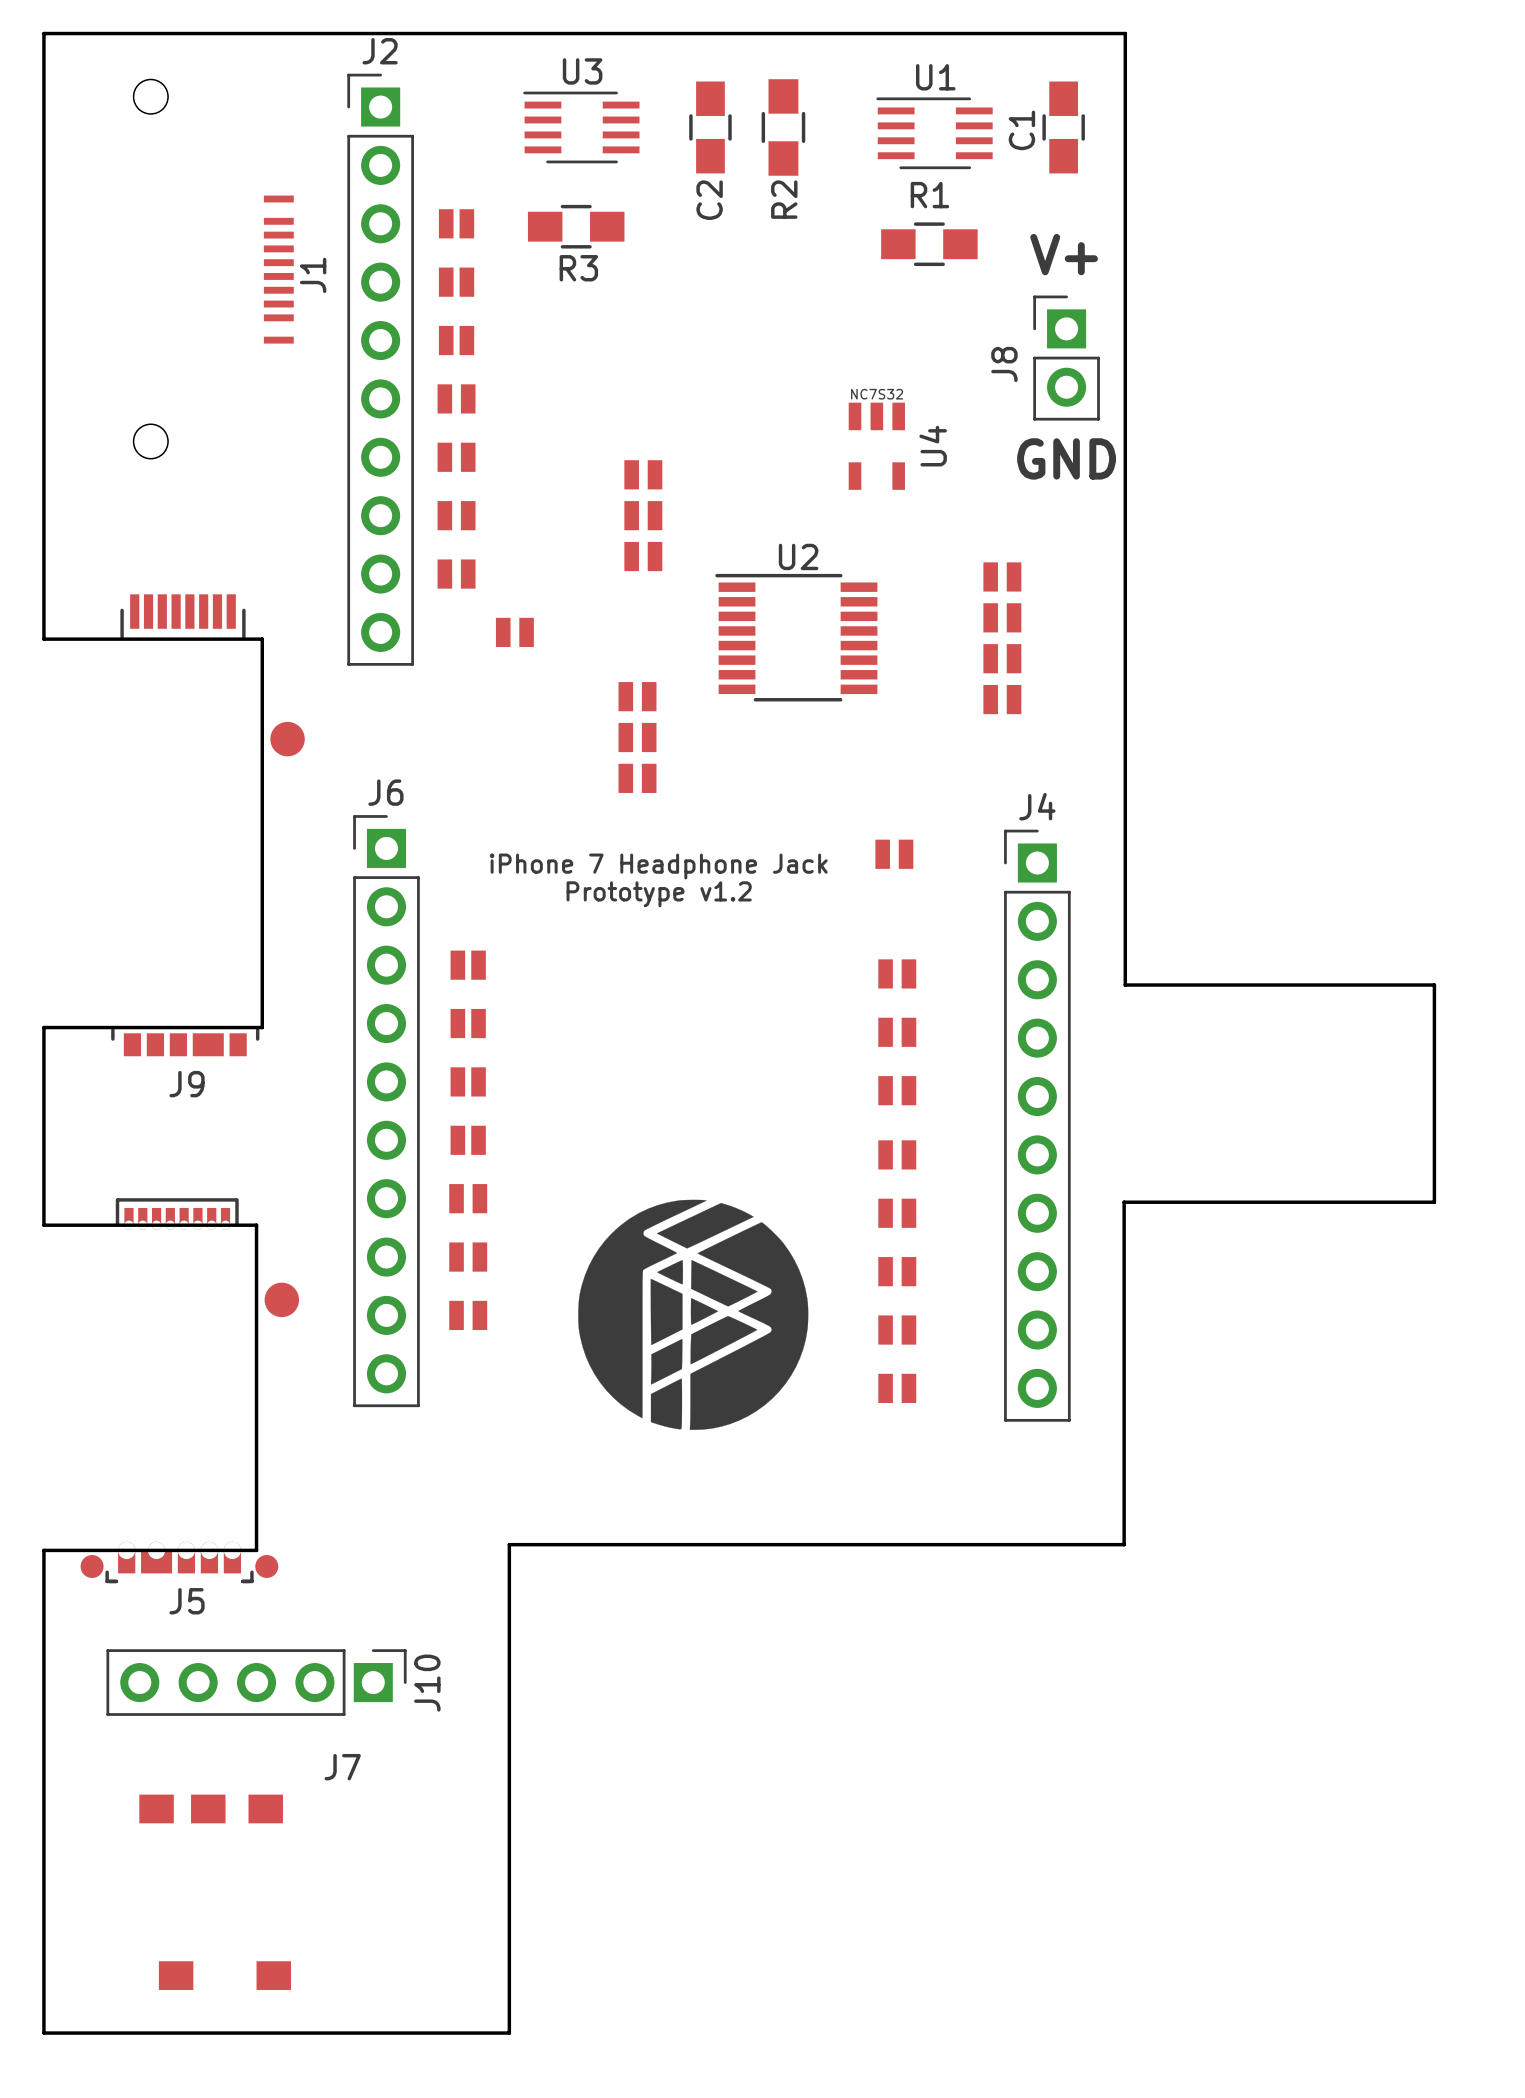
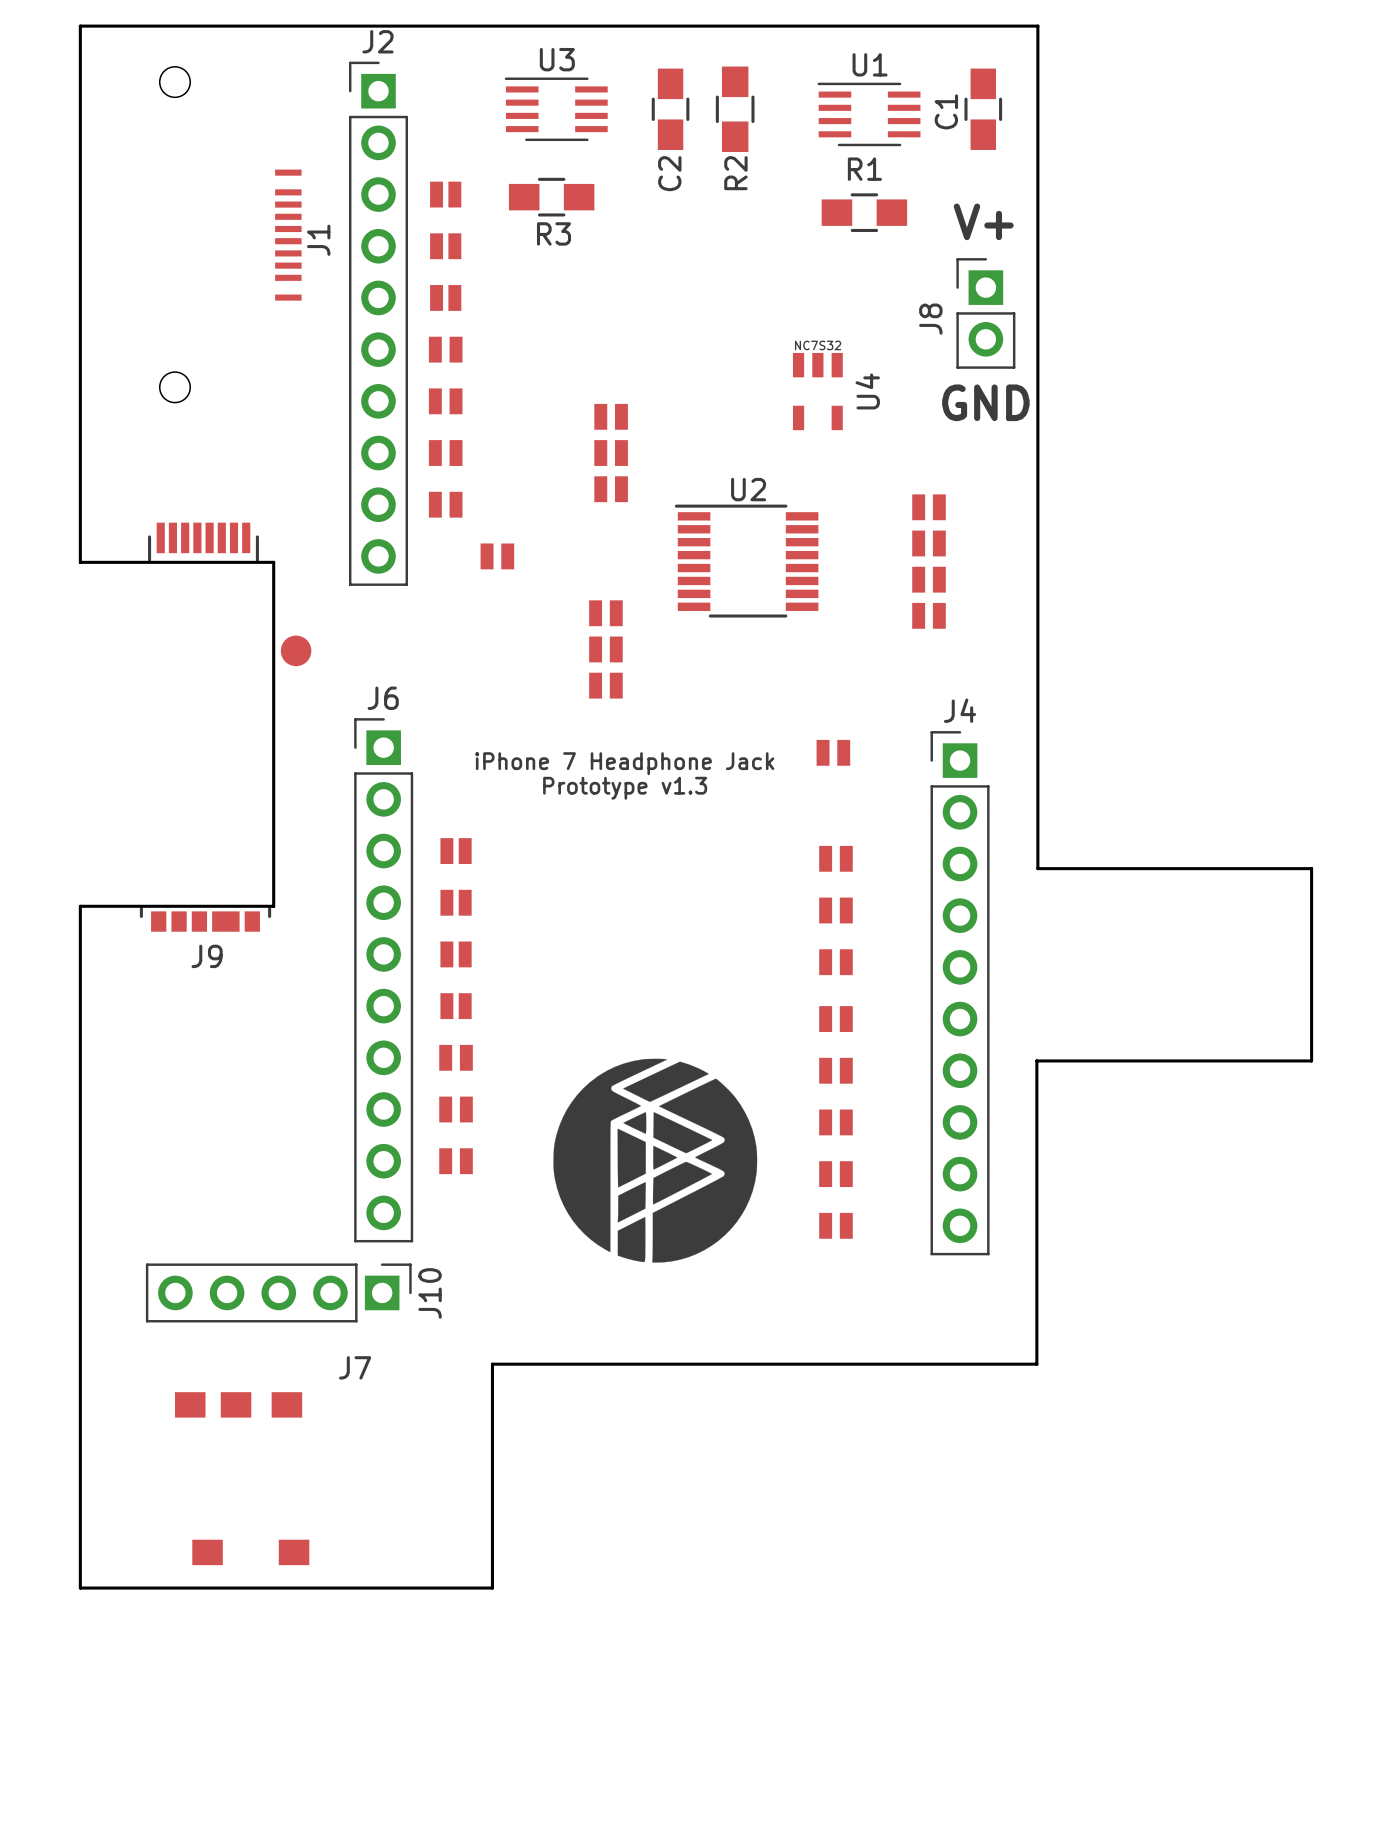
text: Prototype v1.2 (659, 894) -> Prototype v1.3 (625, 788)
board edge: (43, 1225) (256, 1225) (256, 1550) (43, 1550) -> (80, 1081) (80, 1369)
J5: (189, 1390) -> none
J10 position: (256, 1682) -> (278, 1292)
board edge: (43, 1797) (43, 2033) (509, 2033) (509, 1797) -> (80, 1588) (492, 1588)
J7 position: (215, 1892) -> (242, 1478)

